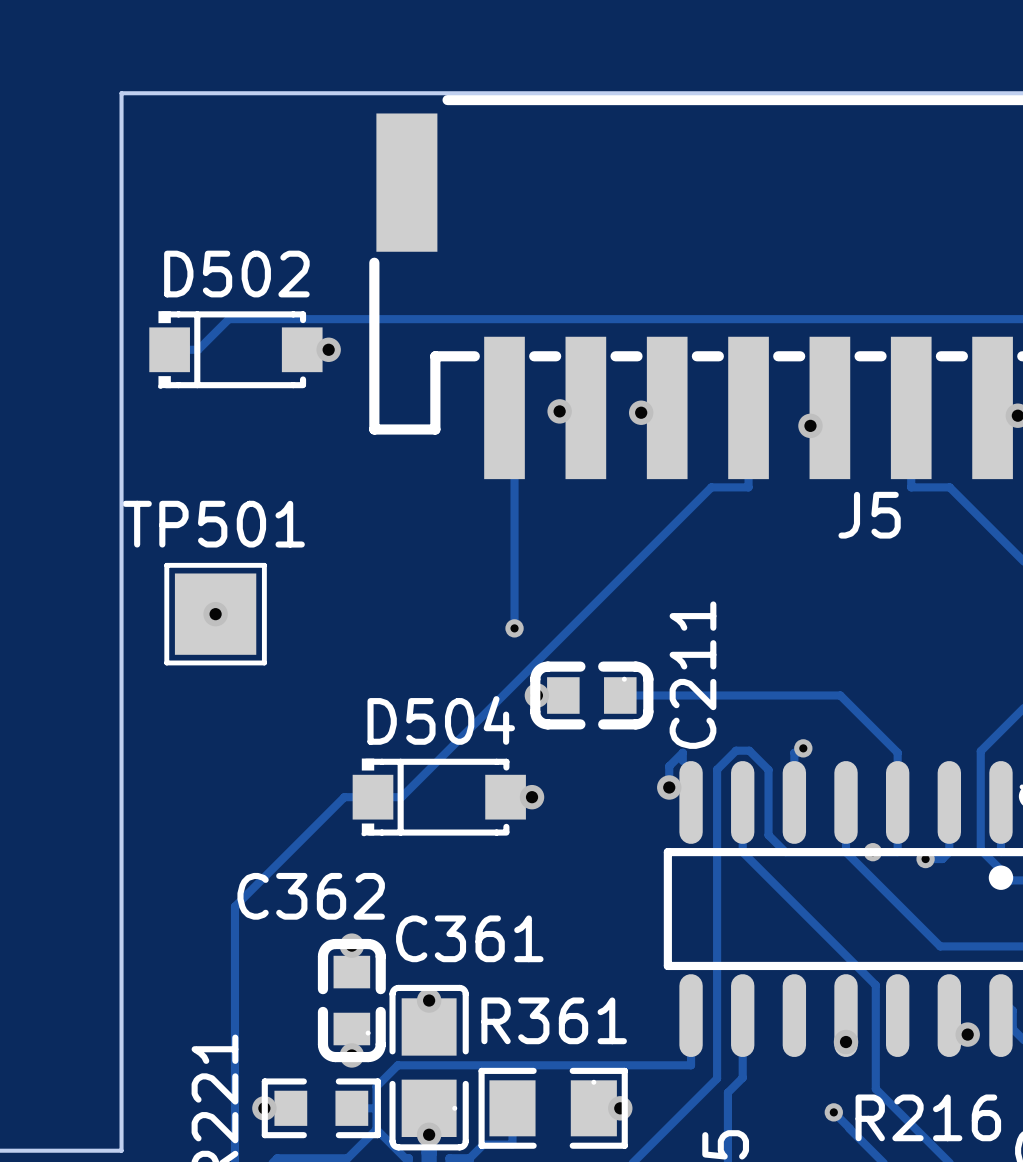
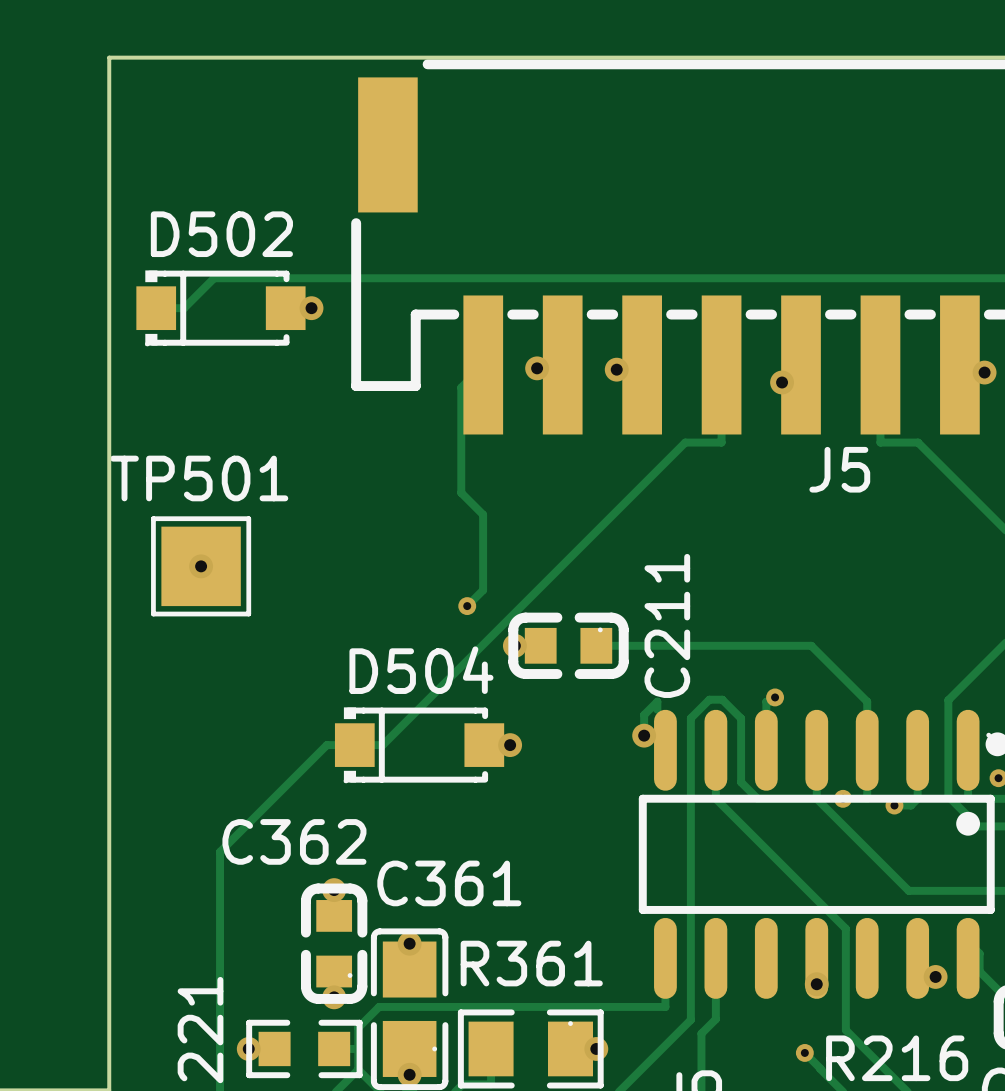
track: (504, 408) (514, 418) (514, 628) -> (483, 365) (461, 387) (461, 492) (483, 514) (483, 590) (467, 606)
via position: (514, 628) -> (467, 606)

